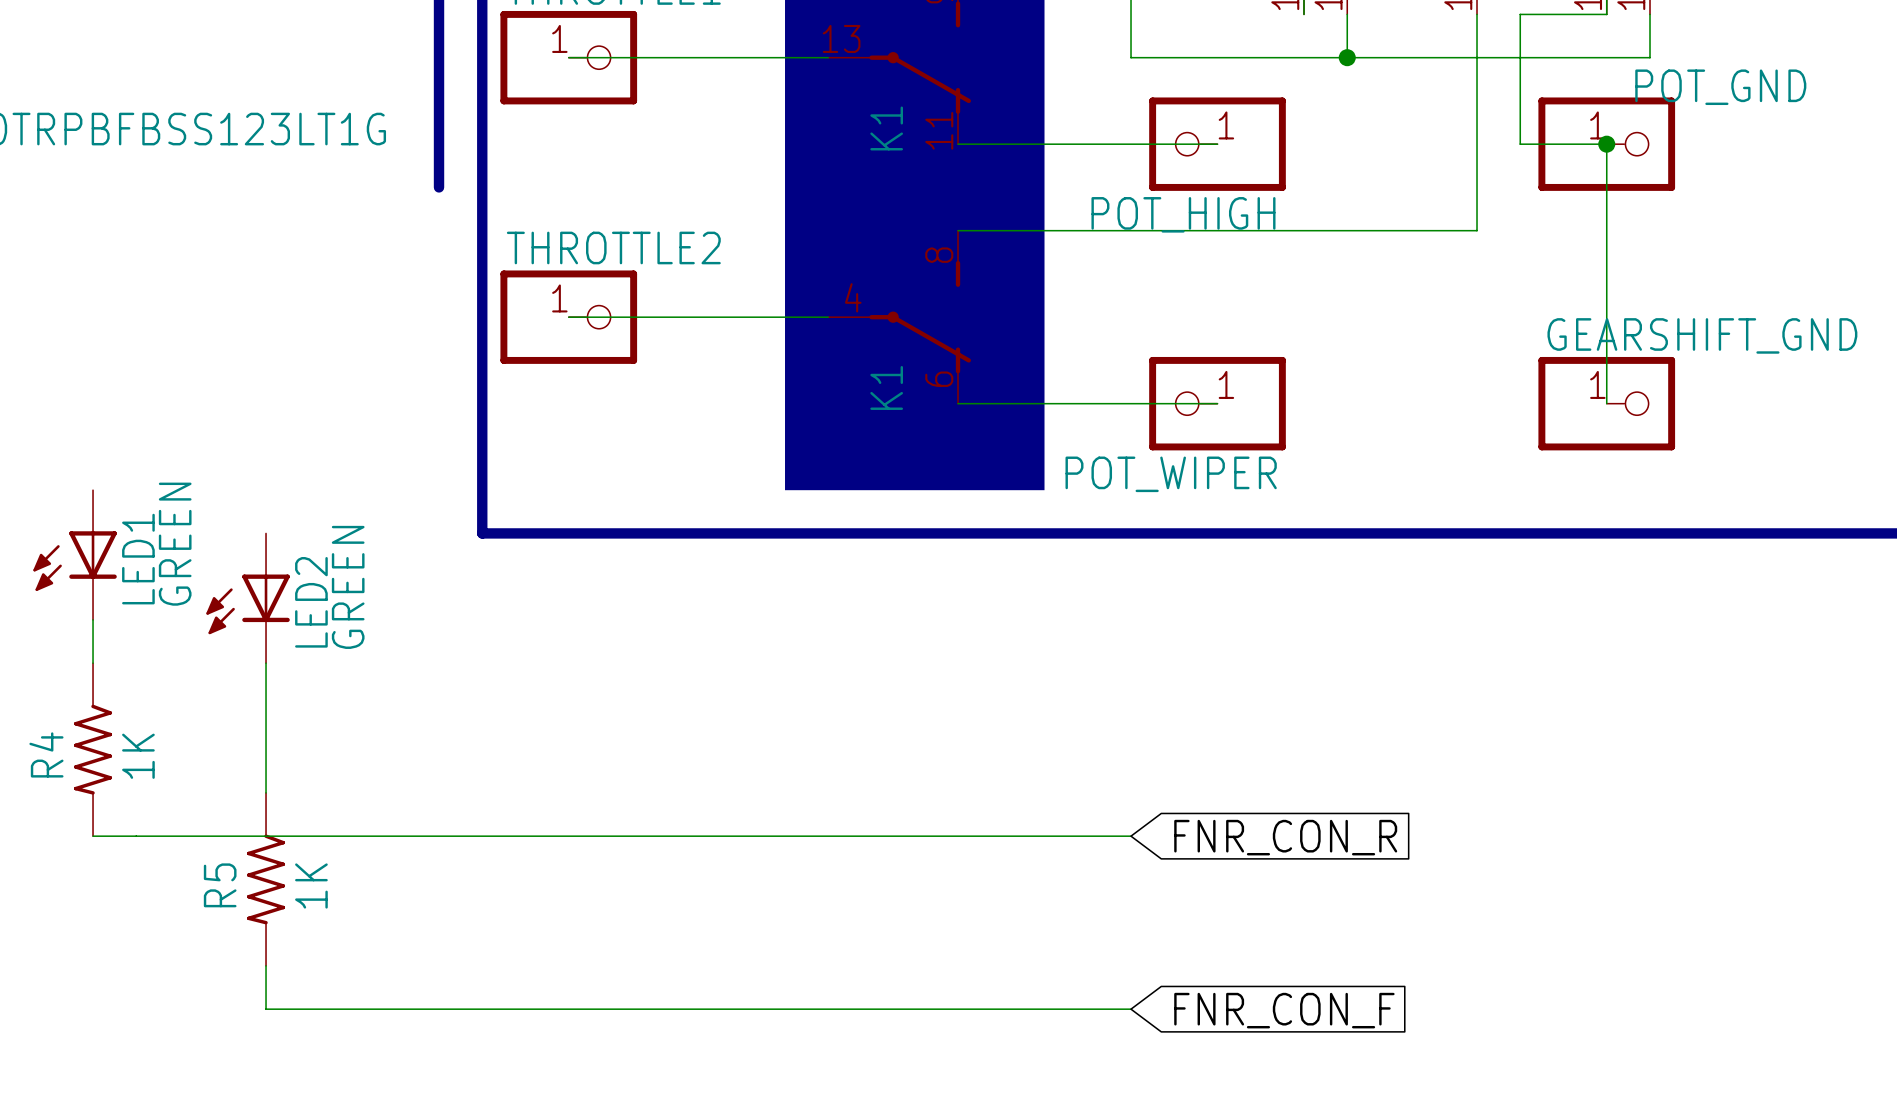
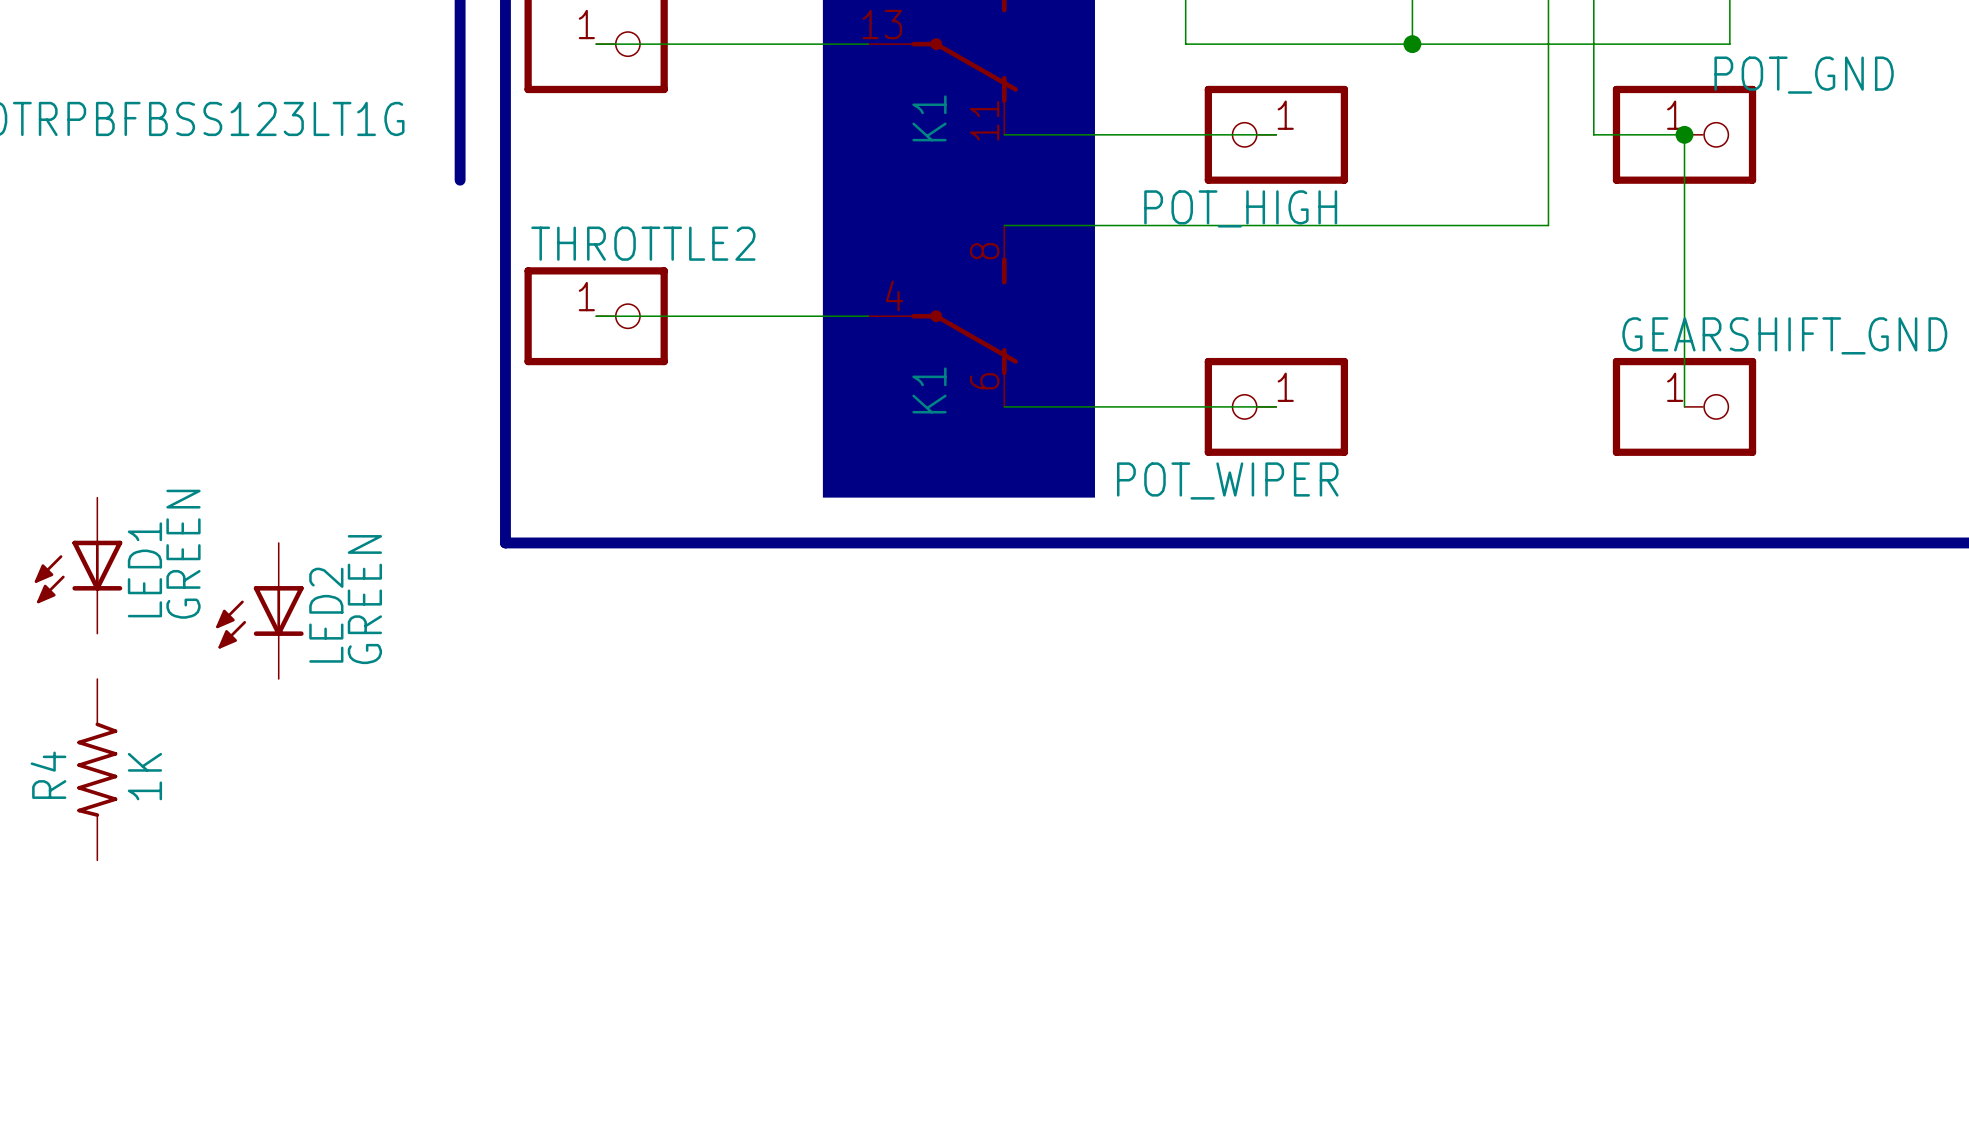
wire: (93, 619) (93, 663) -> none
wire: (266, 663) (266, 792) -> none
wire: (93, 836) (1131, 836) -> none
global label: FNR_CON_R (1285, 837) -> none
R5: 1K (266, 879) -> none
wire: (266, 965) (266, 1009) (1131, 1009) -> none
global label: FNR_CON_F (1284, 1010) -> none

